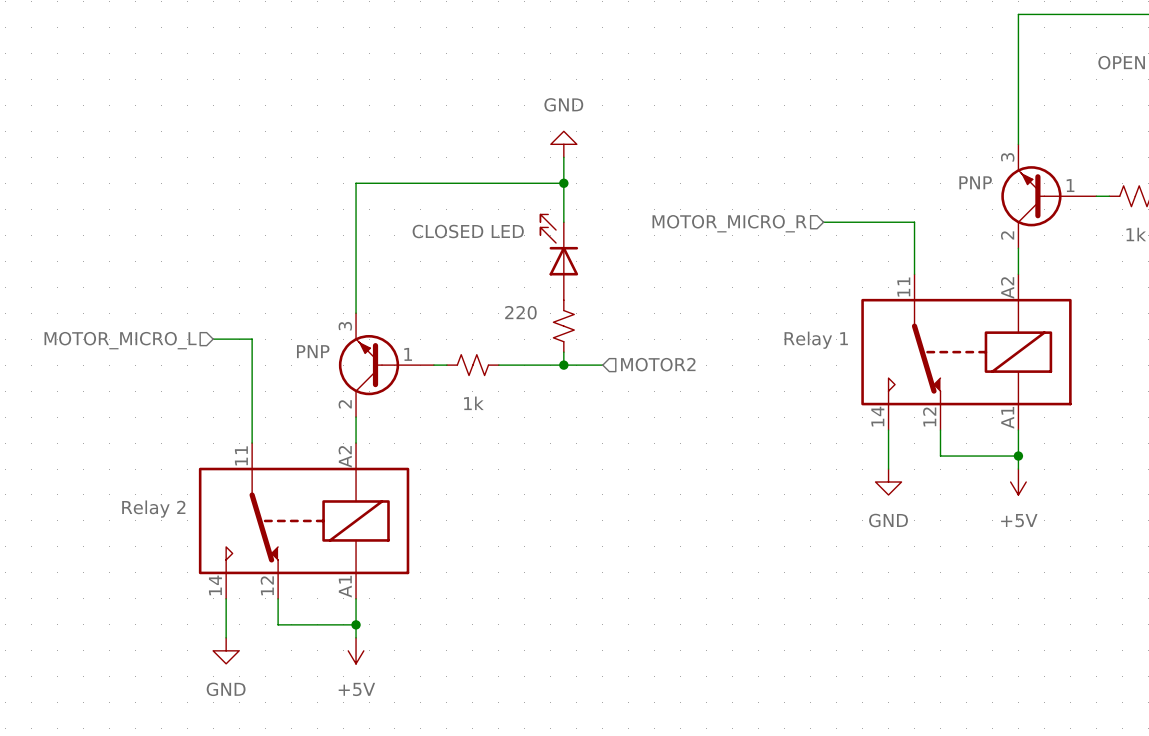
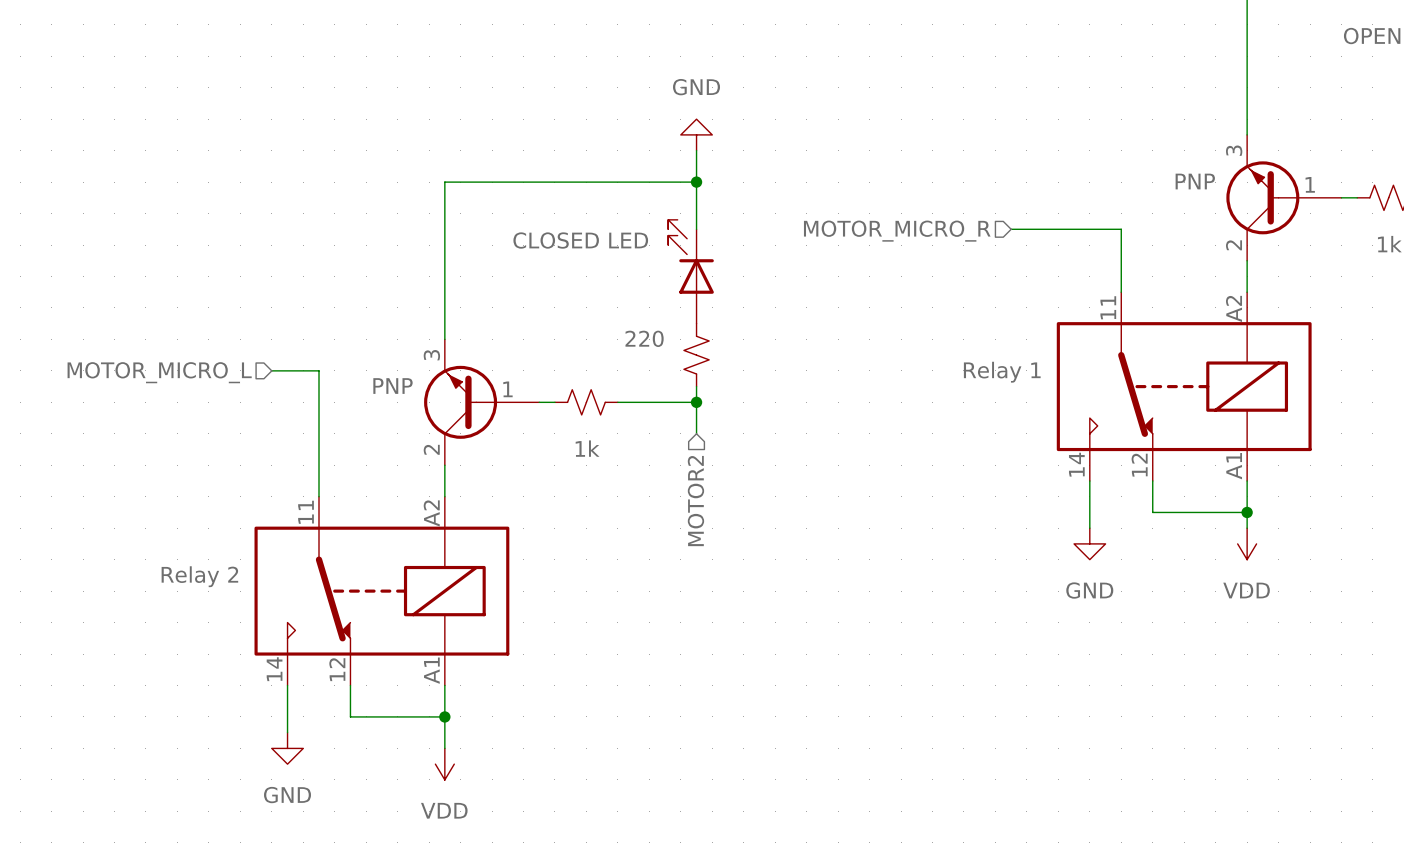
hierarchical label rotation: 0° (658, 364) -> 90° clockwise (695, 501)
hierarchical label position: MOTOR2 (658, 364) -> MOTOR2 (695, 501)
wire: (563, 365) (602, 365) -> (696, 402) (696, 433)
power symbol: +5V (1018, 482) -> VDD (1247, 543)
power symbol: +5V (356, 650) -> none
power symbol: none -> VDD (444, 764)

